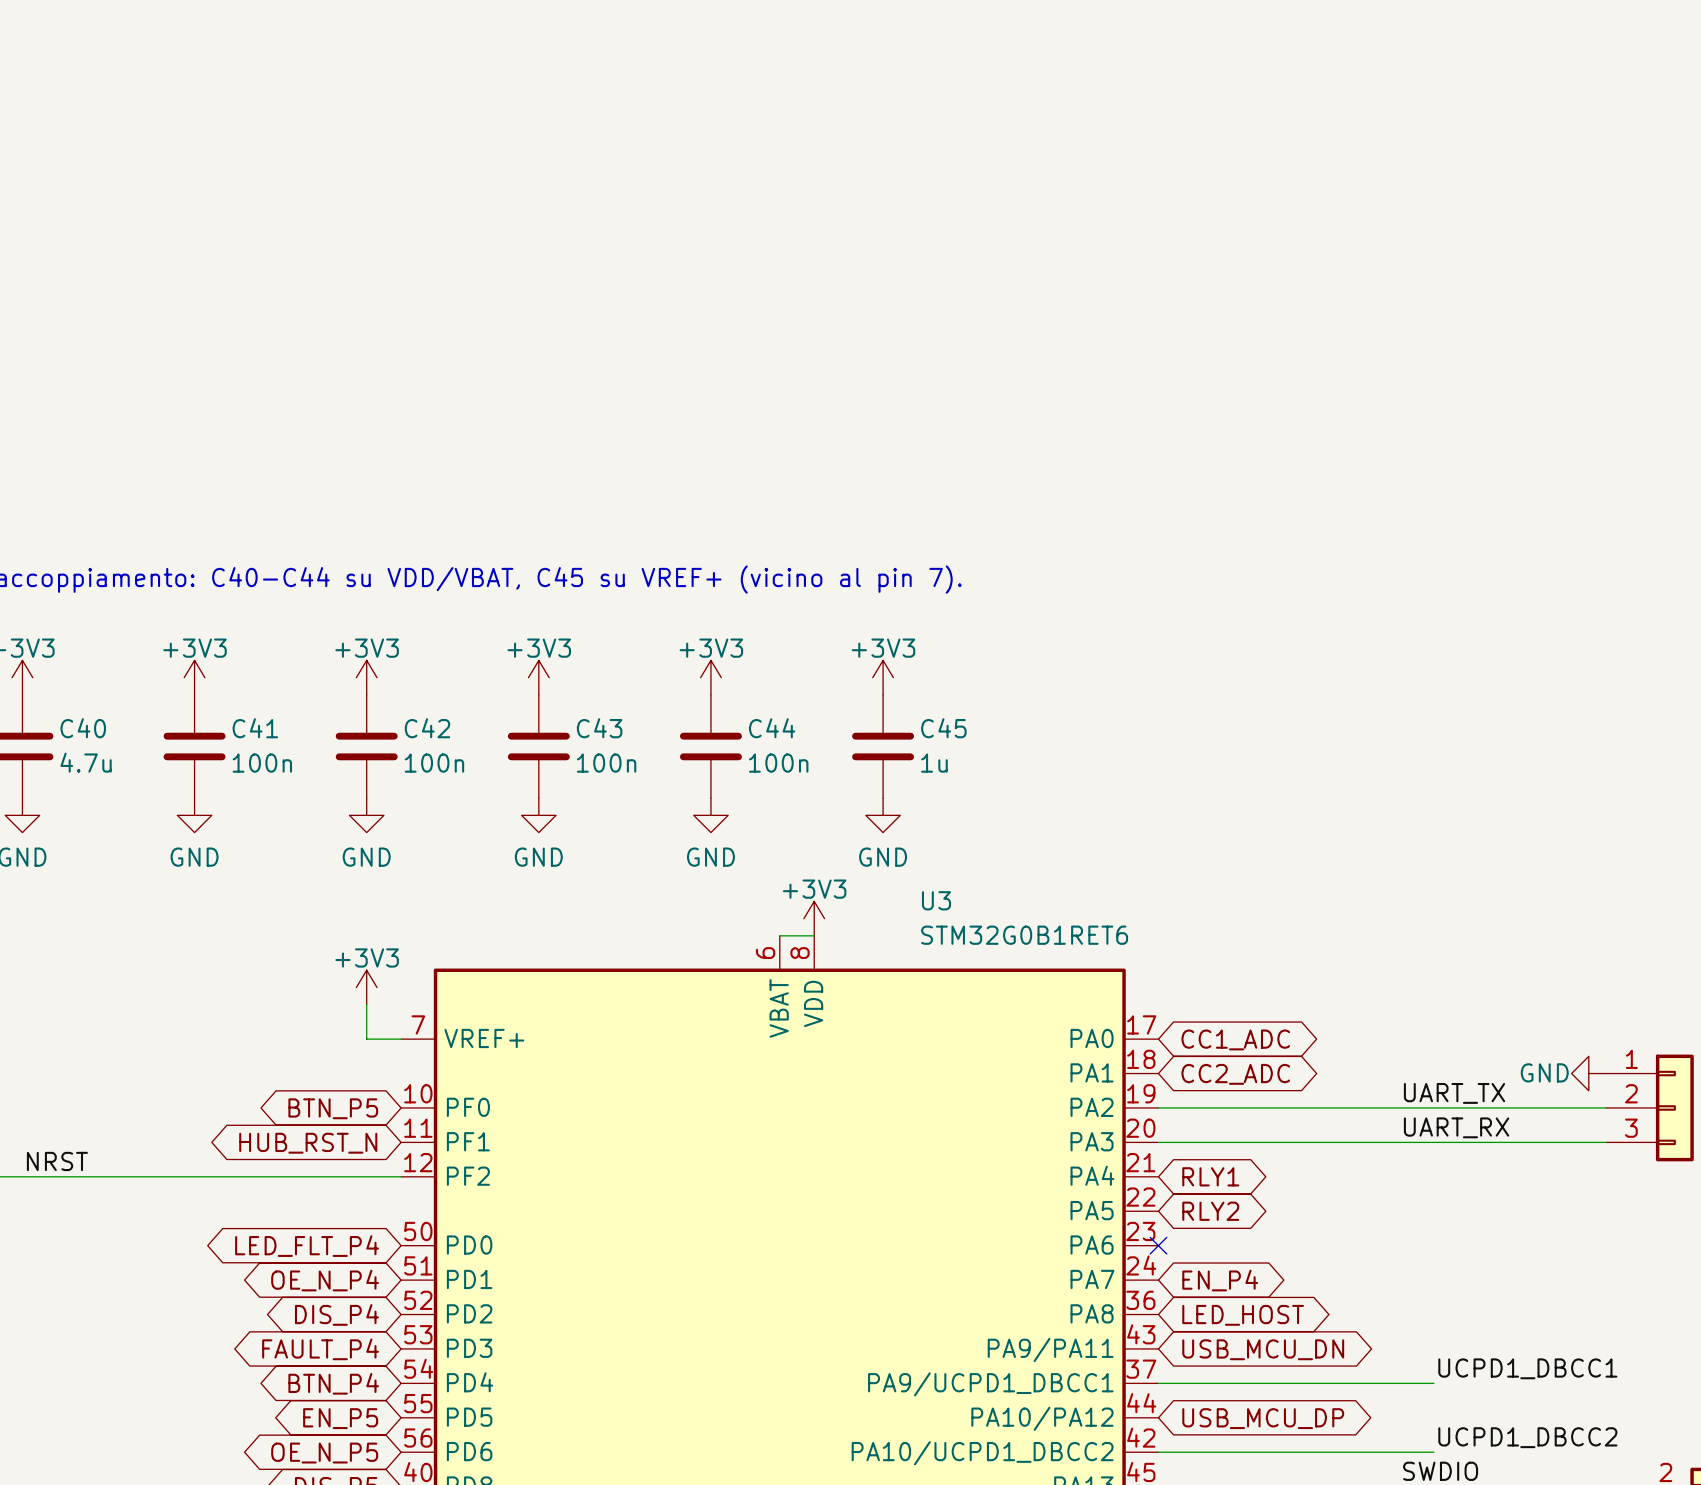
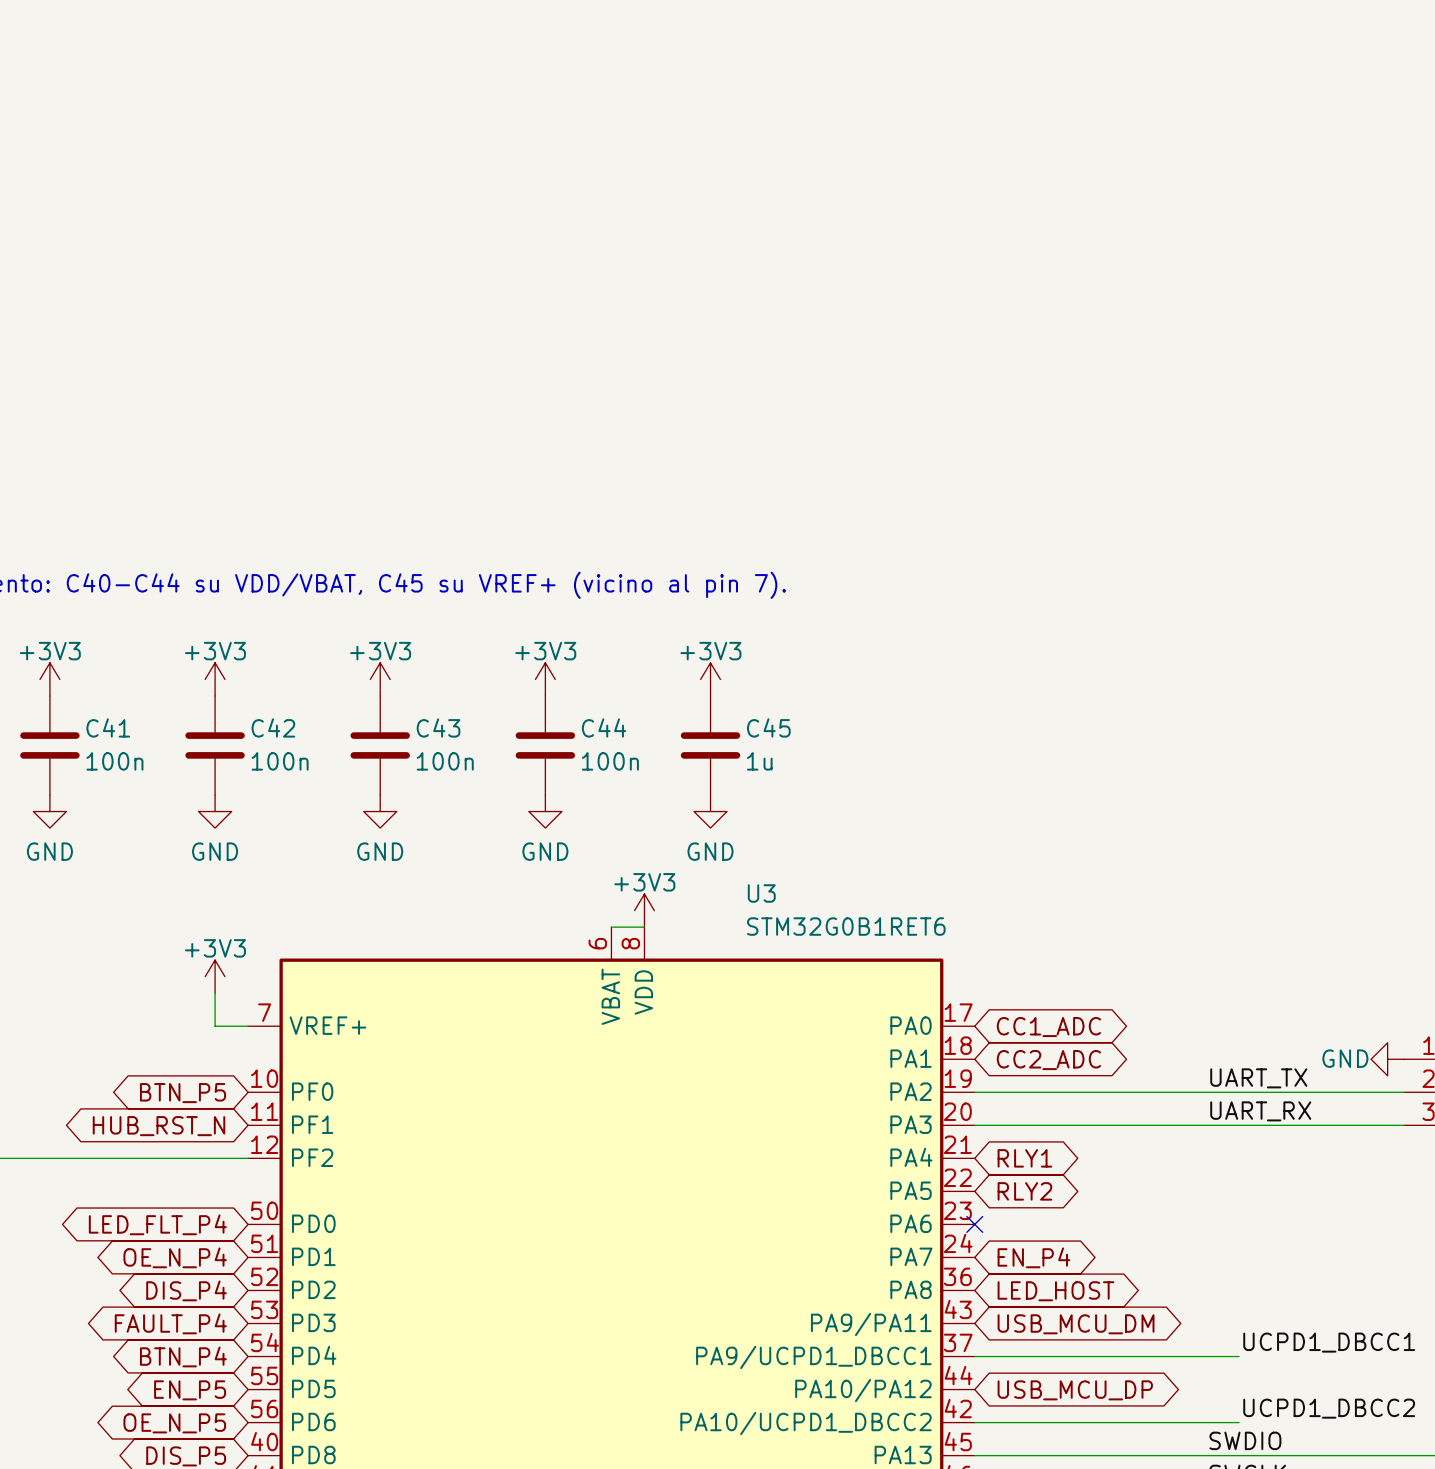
global label: USB_MCU_DN (1263, 1349) -> USB_MCU_DM (1076, 1324)

